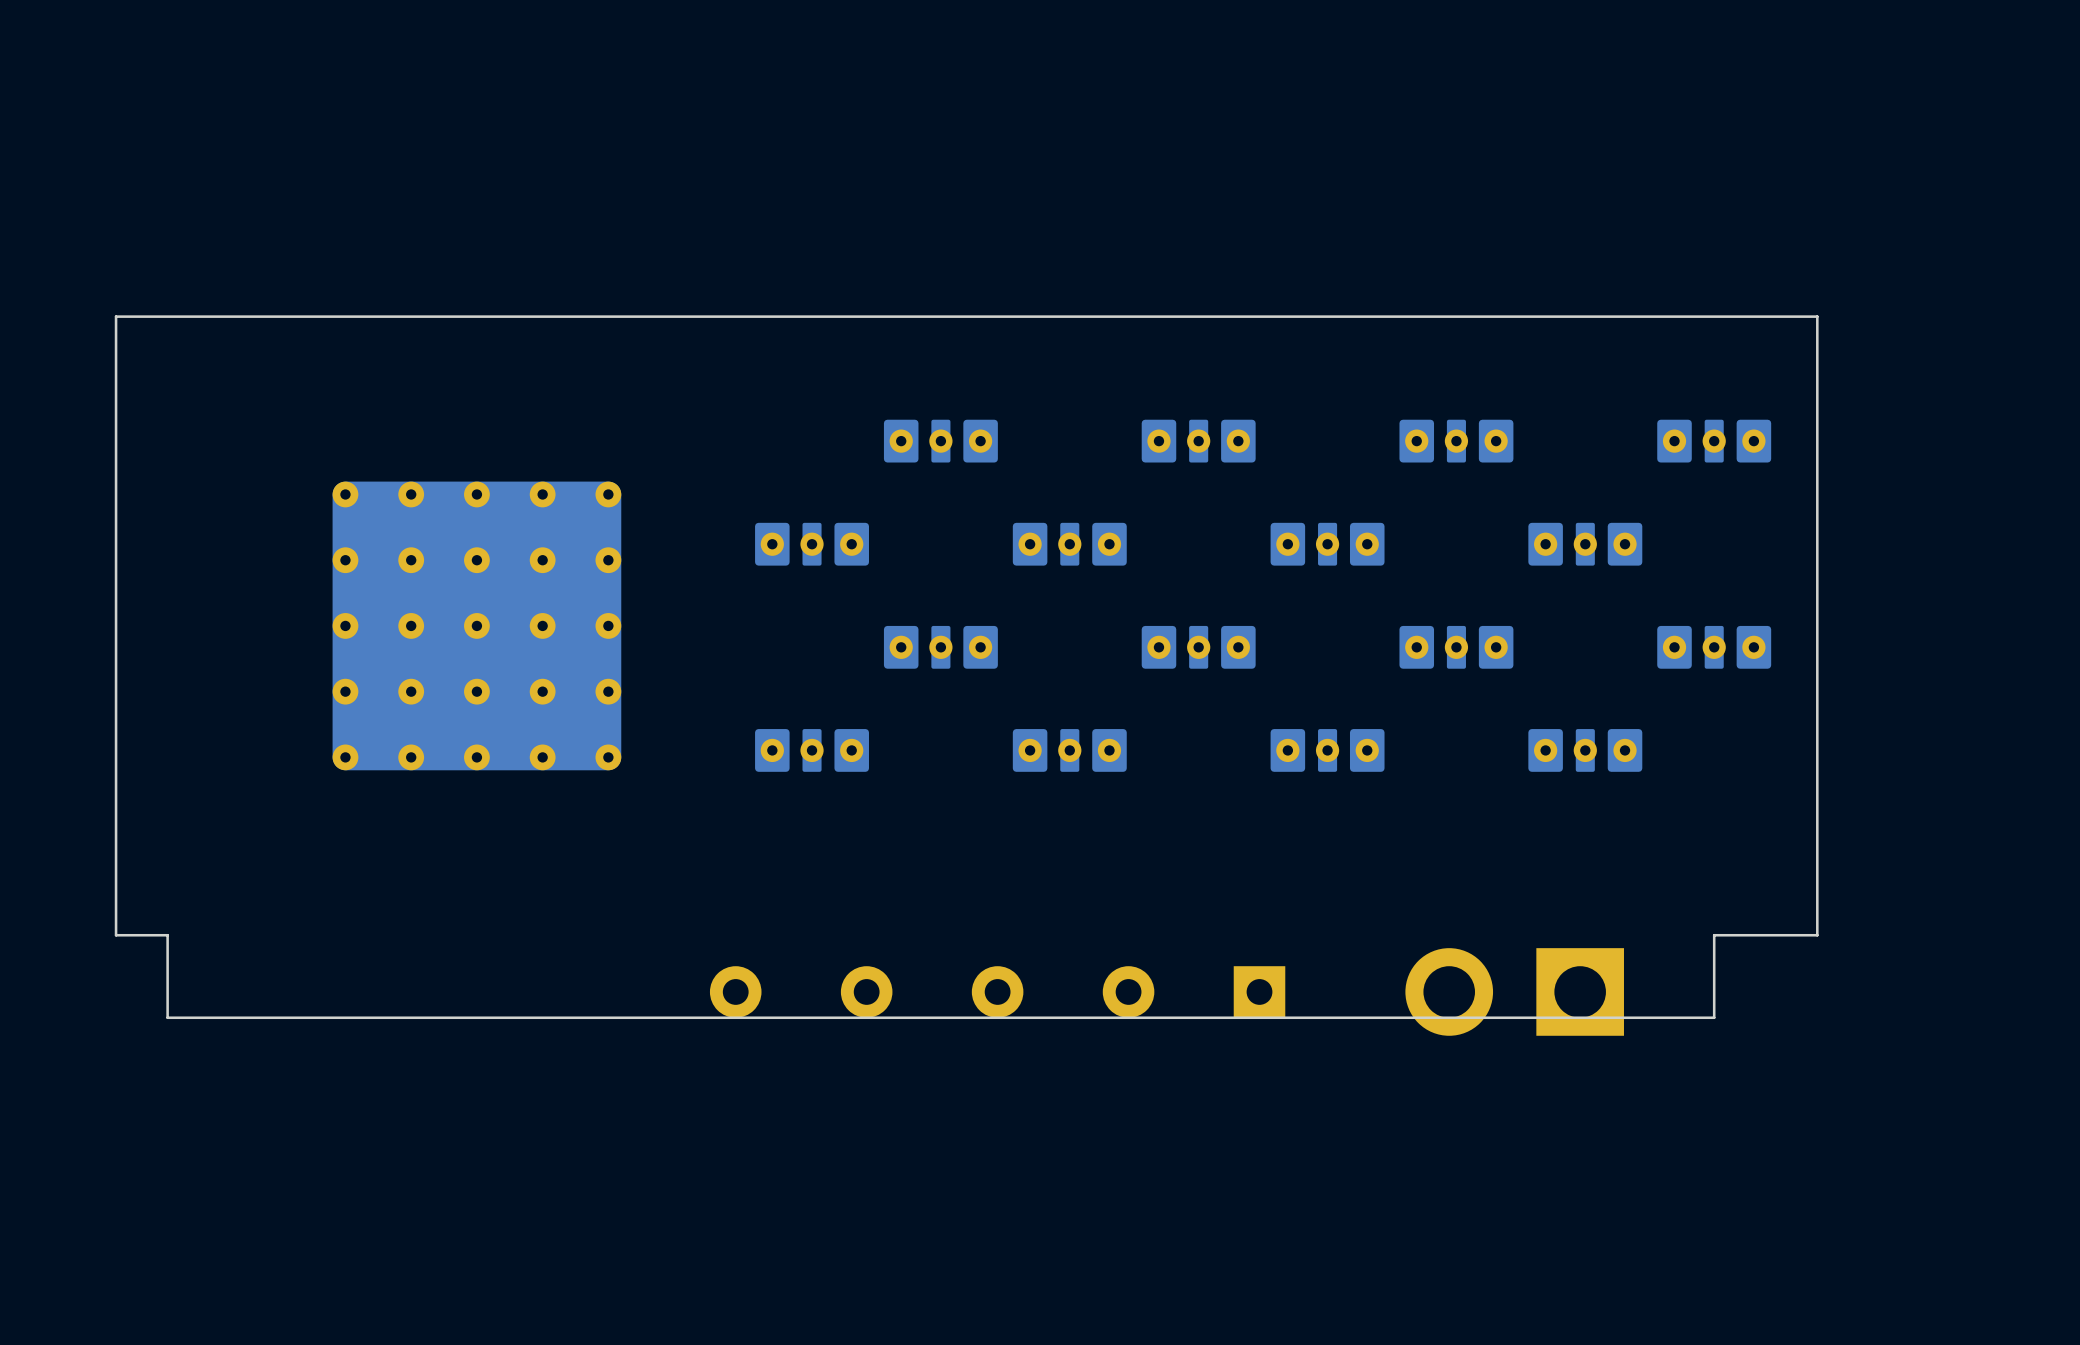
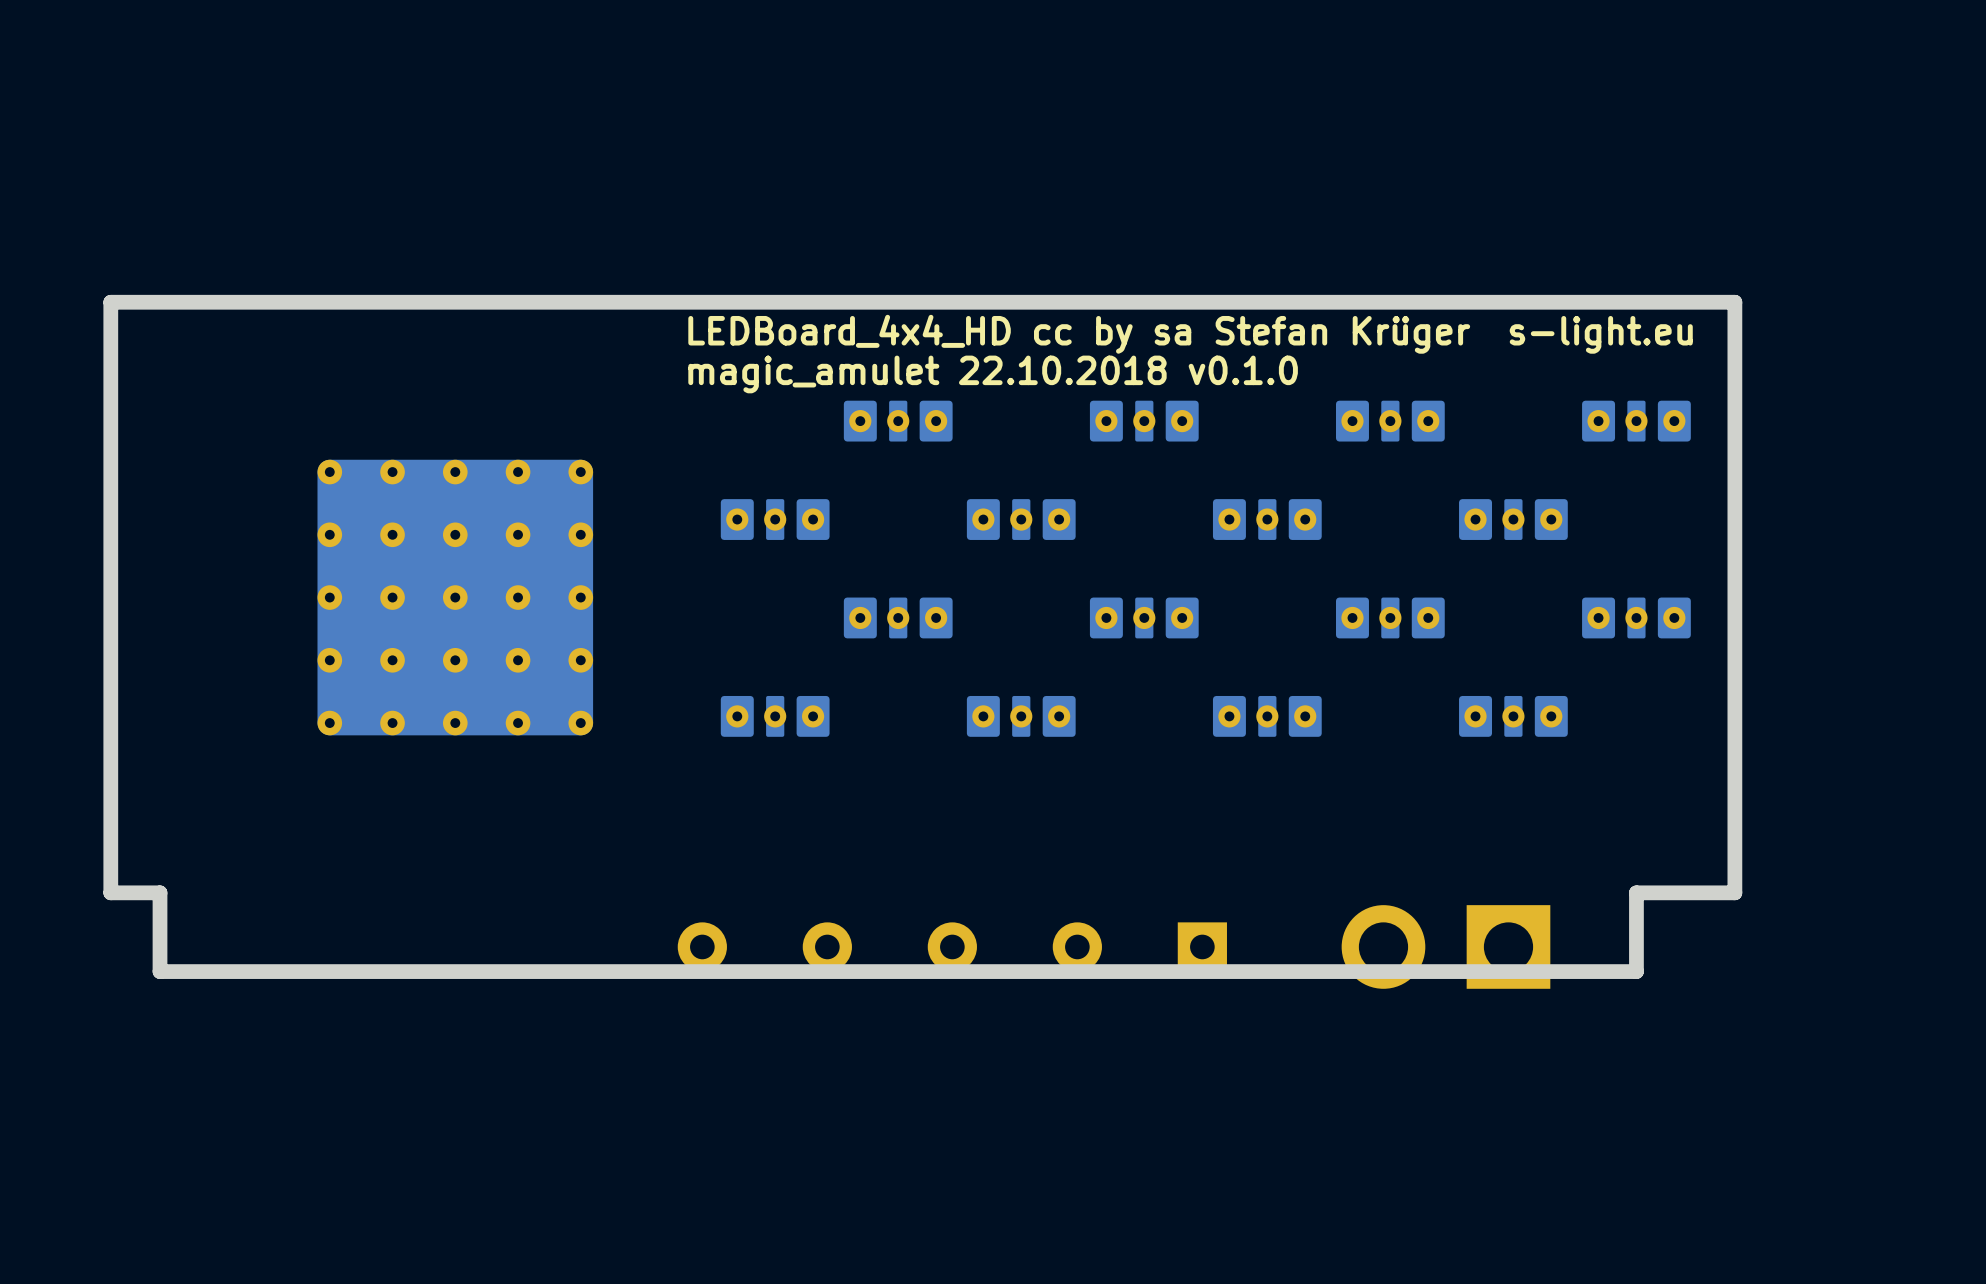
board edge width: thin (1817, 316) (1817, 935) (1714, 935) (1714, 1017) (167, 1017) (167, 935) (116, 935) (116, 316) (1817, 316) -> thick (1734, 302) (1734, 892) (1636, 892) (1636, 971) (160, 971) (160, 892) (110, 892) (110, 302) (1734, 302)
text: none -> LEDBoard_4x4_HD cc by sa Stefan Krüger s-light.eu (1190, 334)
text: none -> magic_amulet 22.10.2018 v0.1.0 (993, 374)

